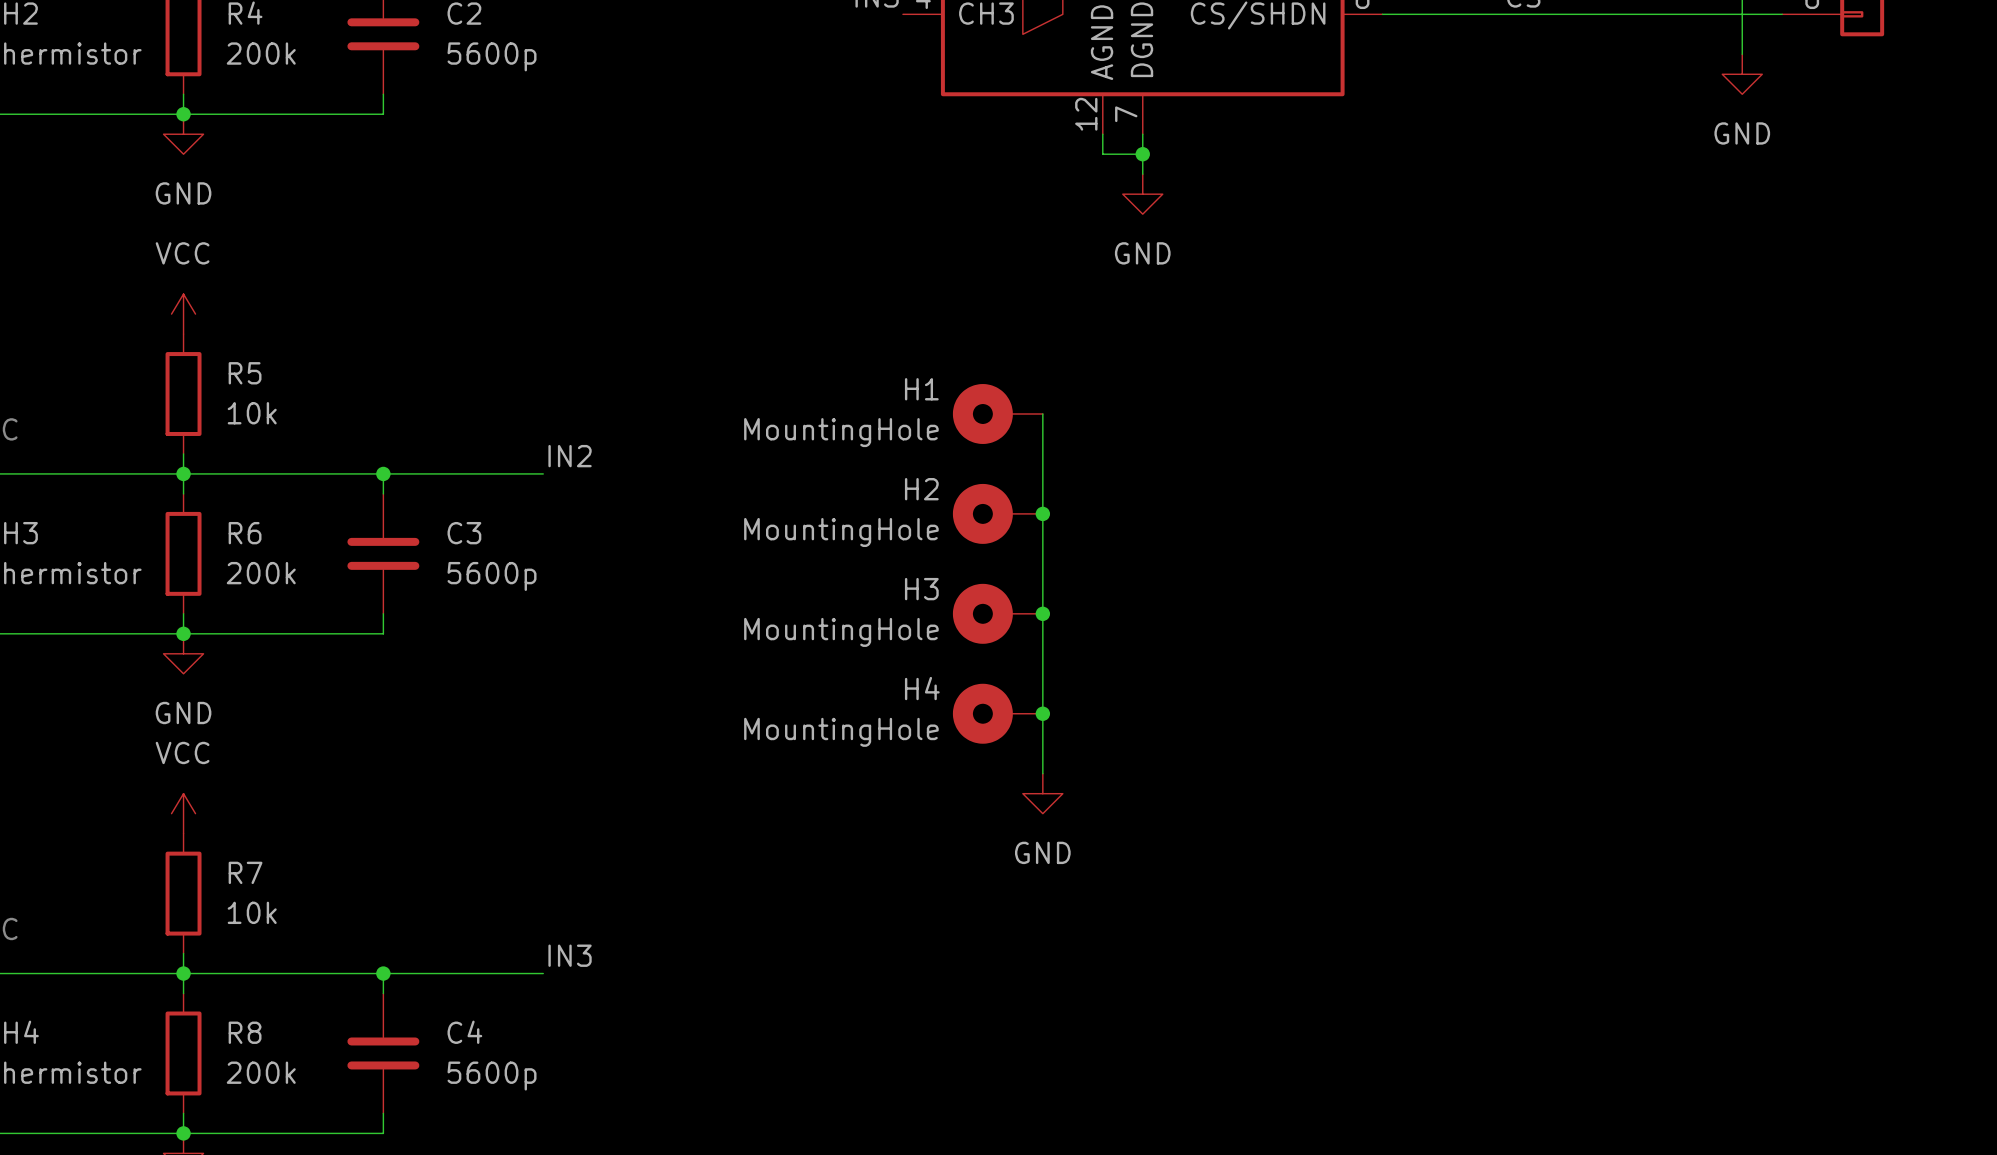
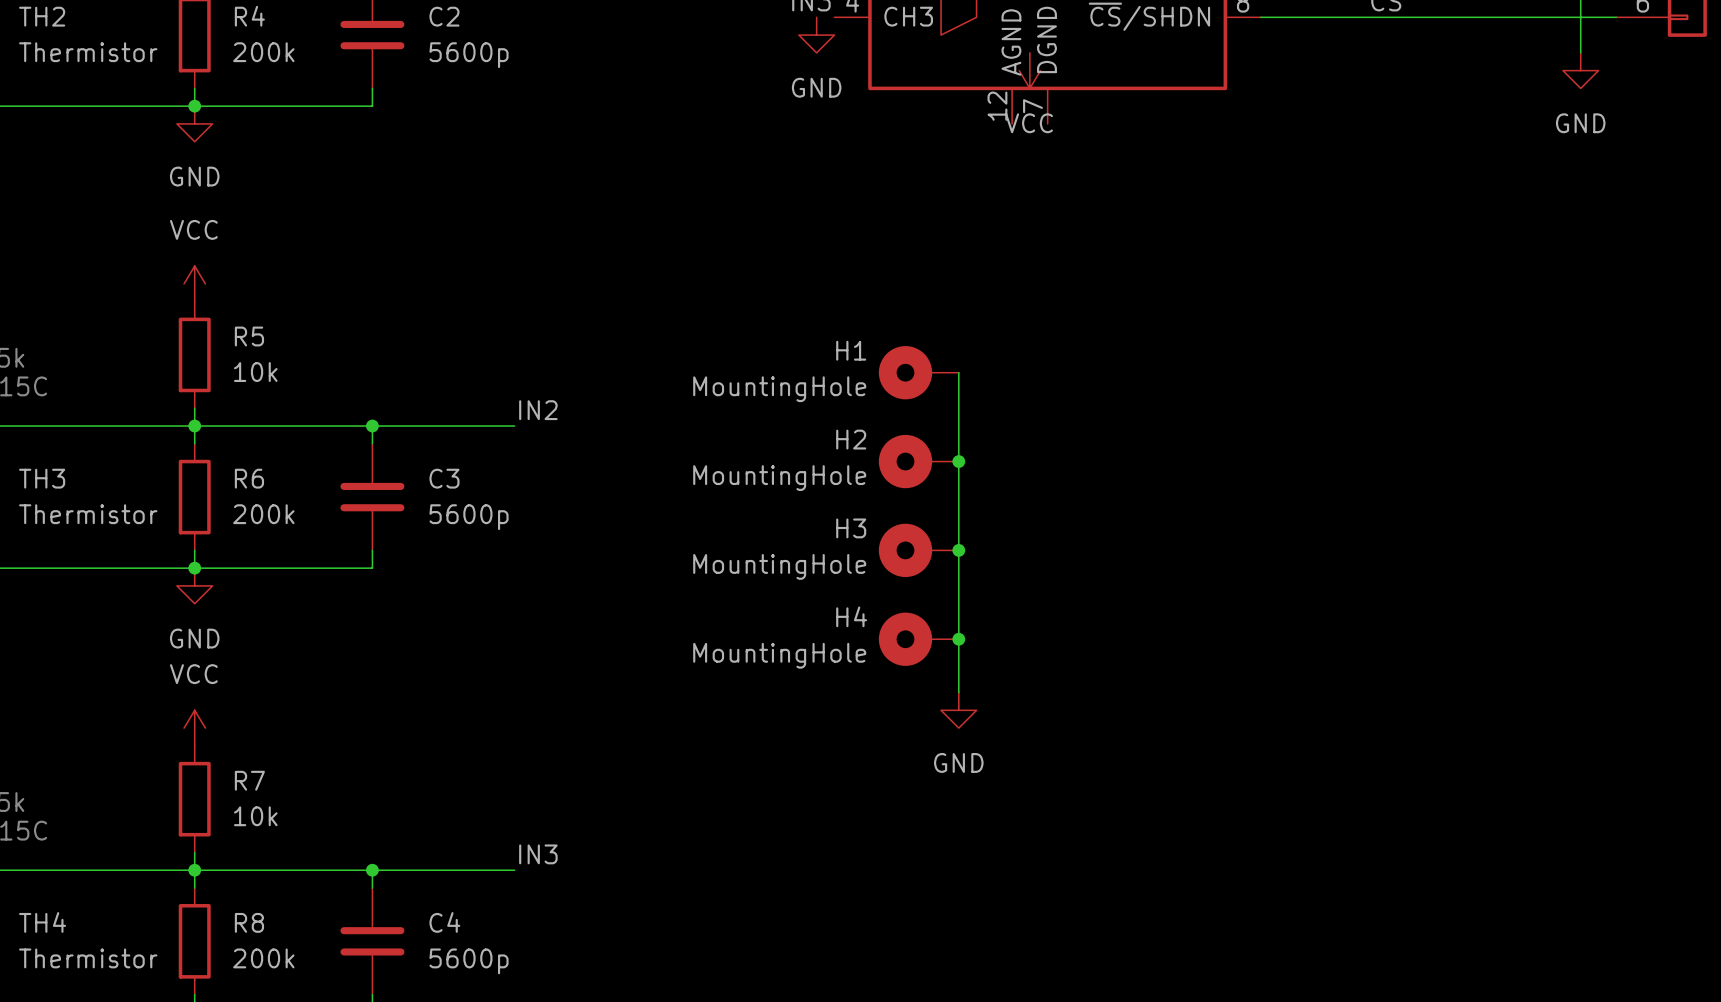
power symbol: none -> VCC (1029, 70)
wire: (1102, 134) (1102, 154) (1142, 154) -> none
wire: (1142, 134) (1142, 174) -> none
junction: (1142, 154) -> none
power symbol position: GND (1142, 194) -> GND (816, 35)

